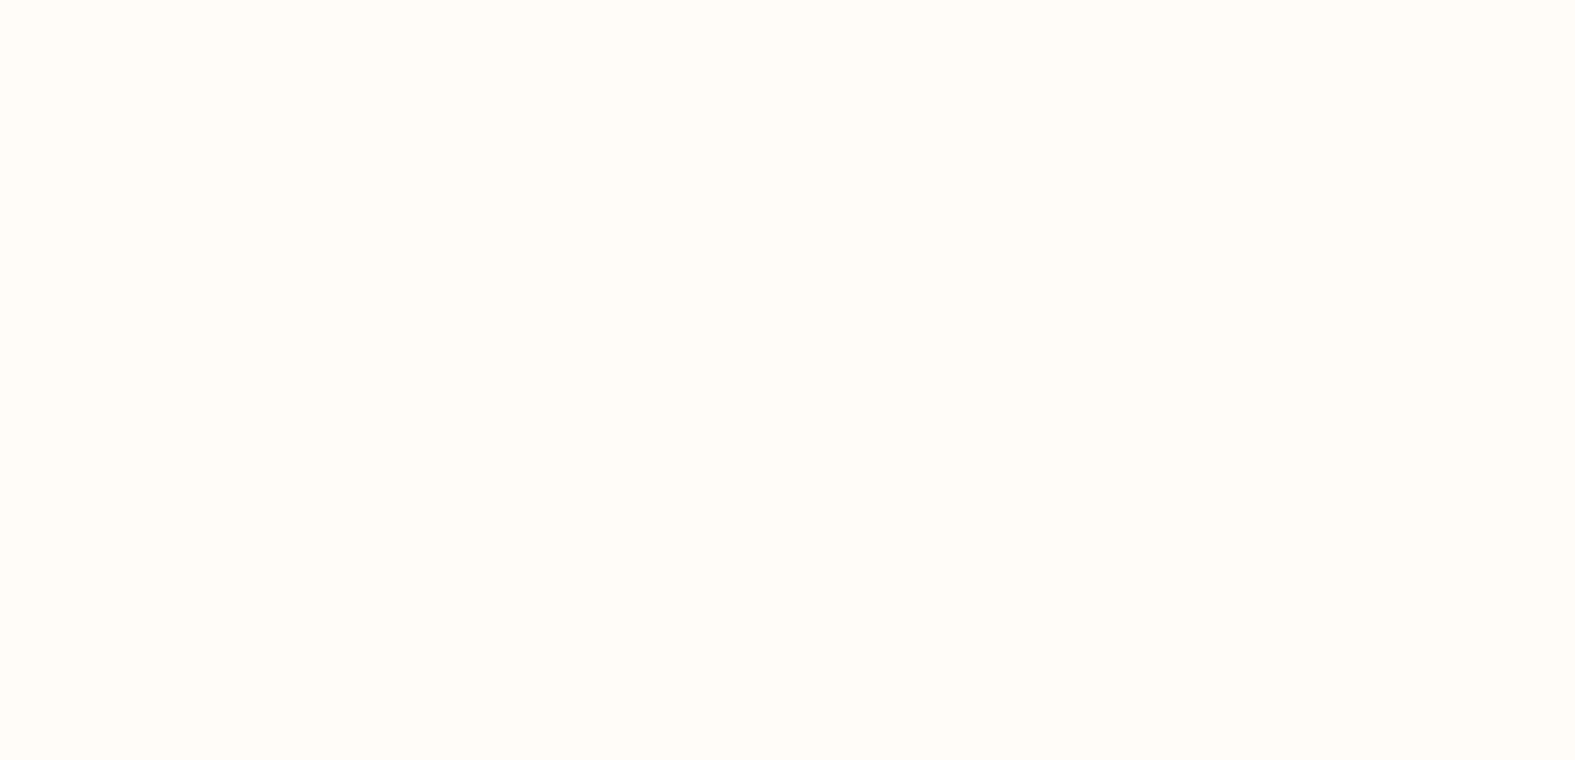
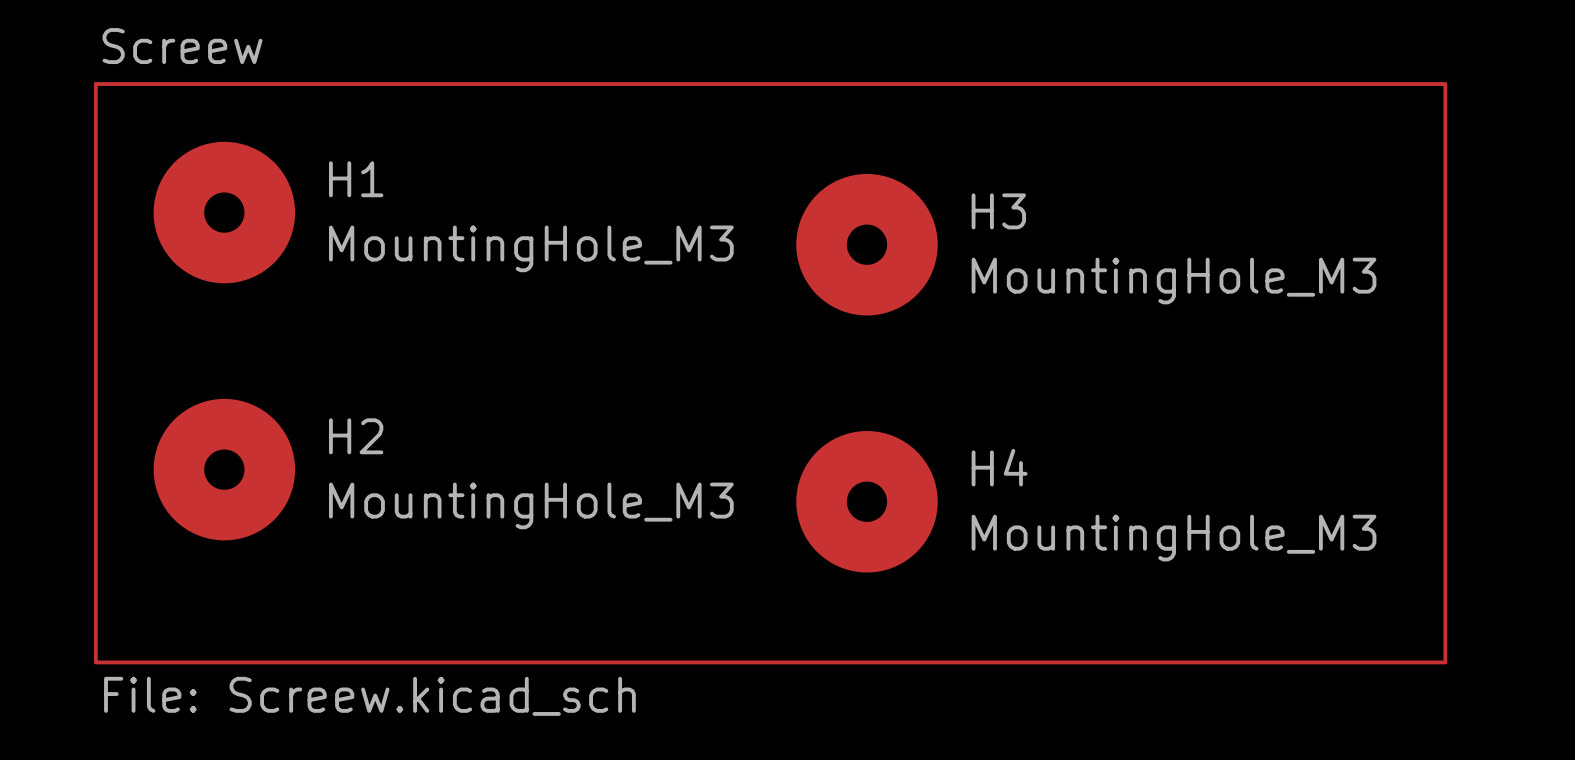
H1: none -> MountingHole_M3 (224, 212)
H3: none -> MountingHole_M3 (866, 244)
sheet Screew: none -> File: Screew.kicad_sch (770, 373)
H2: none -> MountingHole_M3 (224, 469)
H4: none -> MountingHole_M3 (866, 501)

